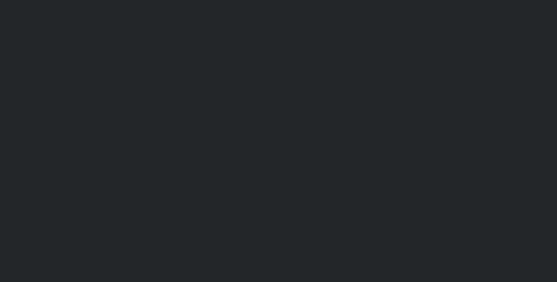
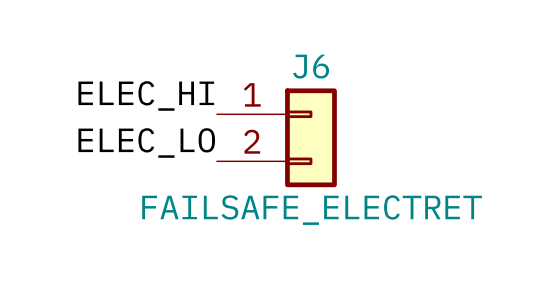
label: none -> ELEC_HI (146, 95)
J6: none -> FAILSAFE_ELECTRET (276, 137)
label: none -> ELEC_LO (146, 142)

